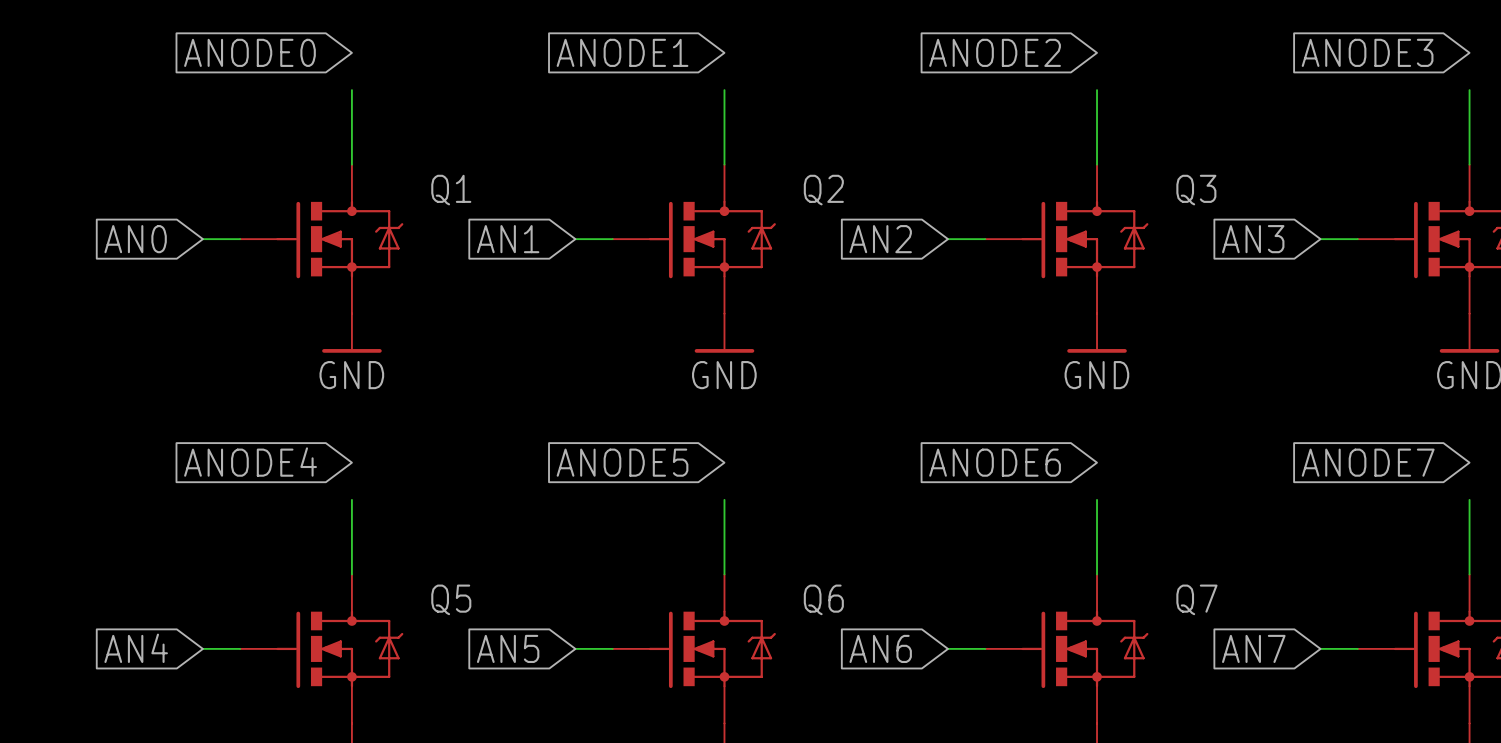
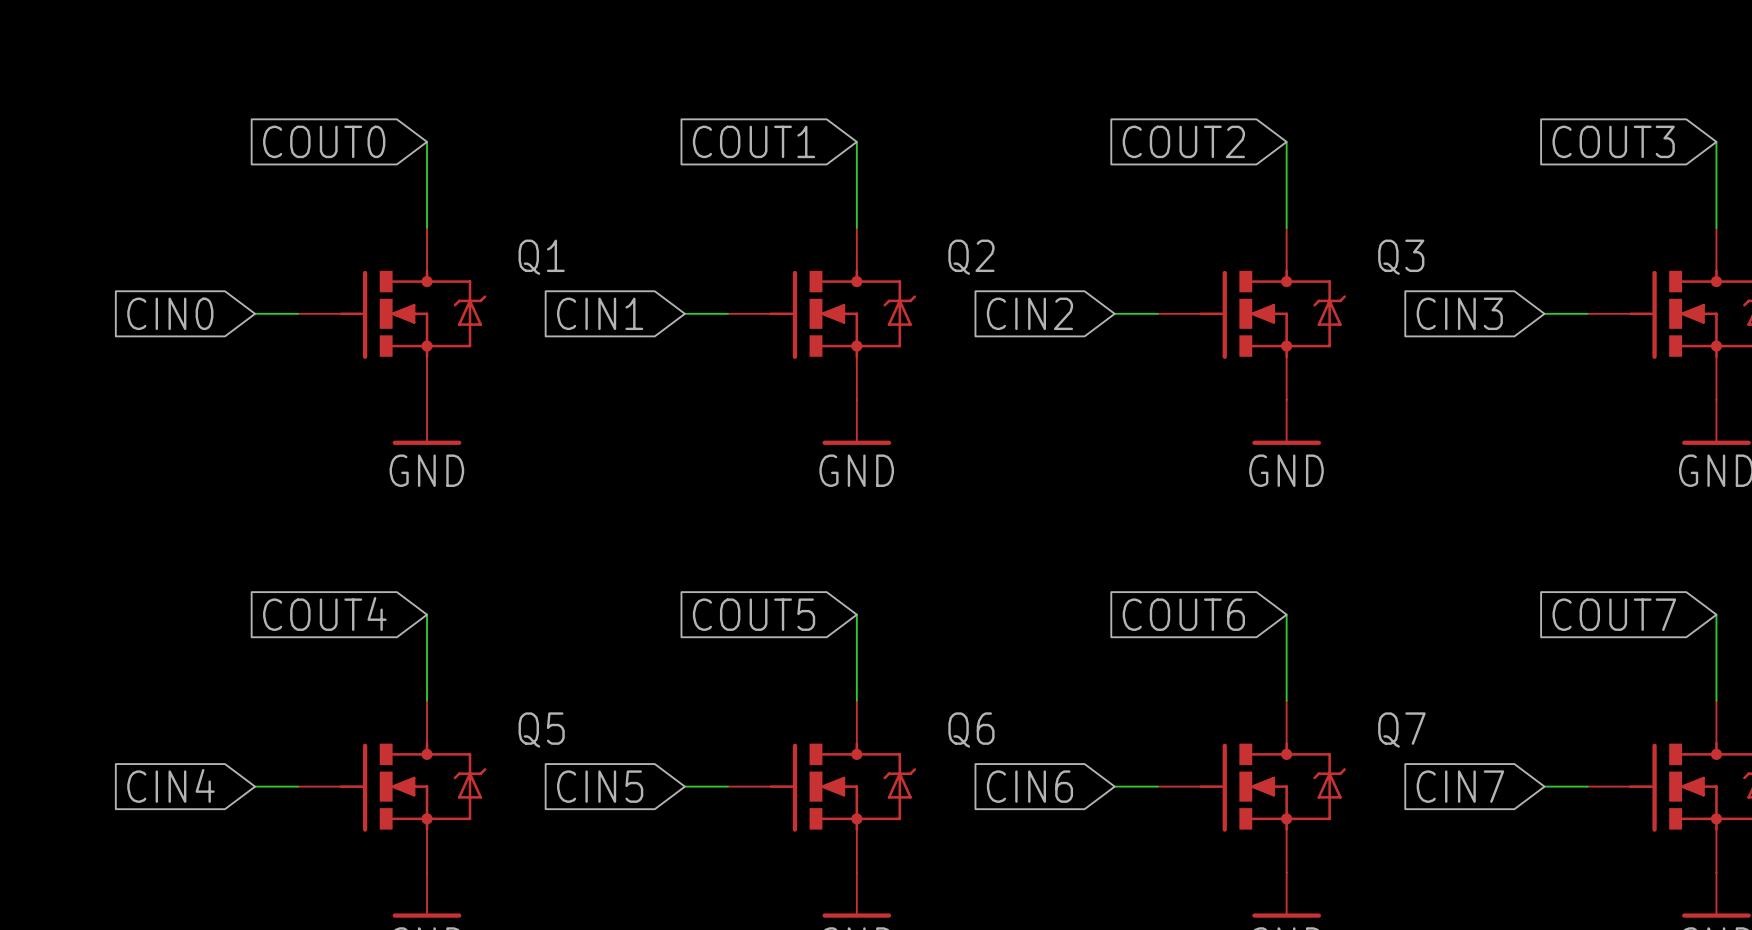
global label: ANODE0 (249, 52) -> none
global label: ANODE1 (622, 52) -> none
global label: ANODE2 (995, 52) -> none
global label: ANODE3 (1367, 52) -> none
global label: none -> COUT0 (324, 141)
global label: none -> COUT1 (754, 141)
global label: none -> COUT2 (1183, 141)
global label: none -> COUT3 (1613, 141)
global label: AN0 (135, 239) -> CIN0 (170, 313)
global label: AN1 (508, 239) -> CIN1 (600, 313)
global label: AN2 (880, 239) -> CIN2 (1029, 313)
global label: AN3 (1253, 239) -> CIN3 (1459, 313)
global label: ANODE4 (250, 462) -> none
global label: ANODE5 (622, 462) -> none
global label: ANODE6 (995, 462) -> none
global label: ANODE7 (1368, 462) -> none
global label: none -> COUT4 (324, 613)
global label: none -> COUT5 (754, 614)
global label: none -> COUT6 (1183, 614)
global label: none -> COUT7 (1614, 614)
global label: AN4 (136, 648) -> CIN4 (170, 785)
global label: AN5 (508, 648) -> CIN5 (600, 786)
global label: AN6 (880, 648) -> CIN6 (1029, 786)
global label: AN7 (1253, 648) -> CIN7 (1460, 786)

